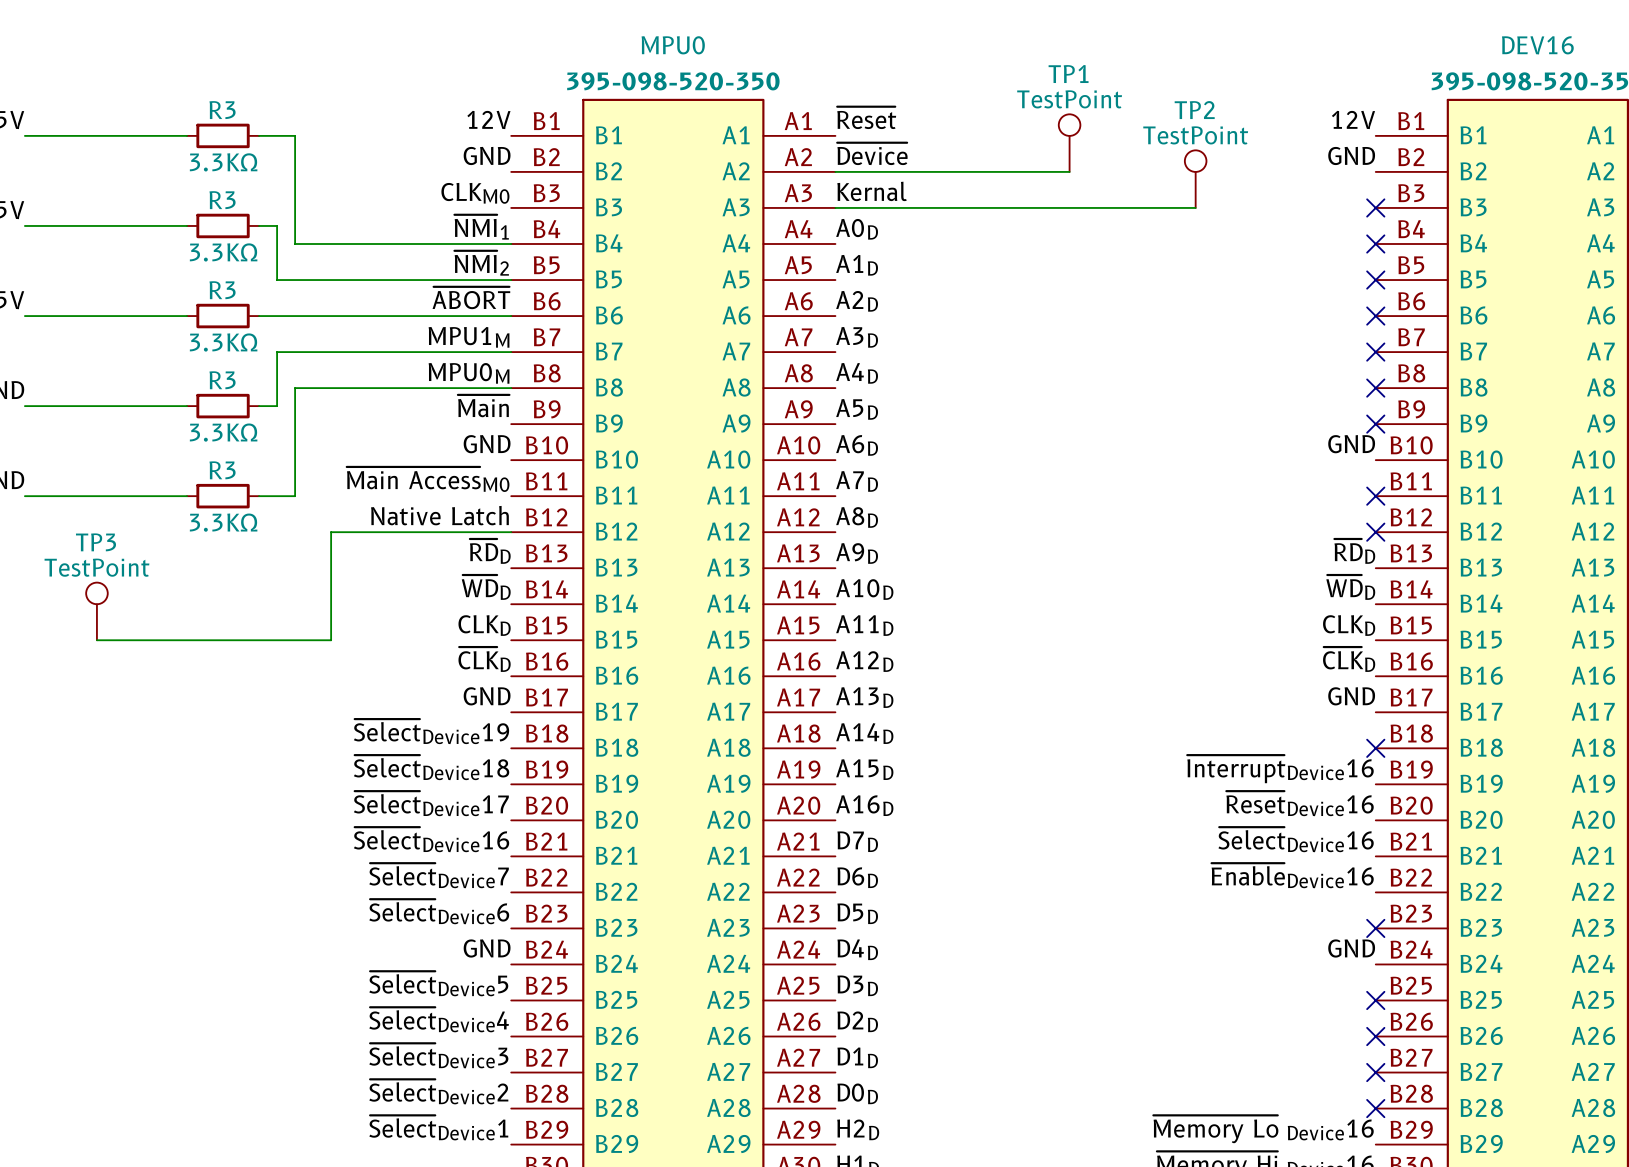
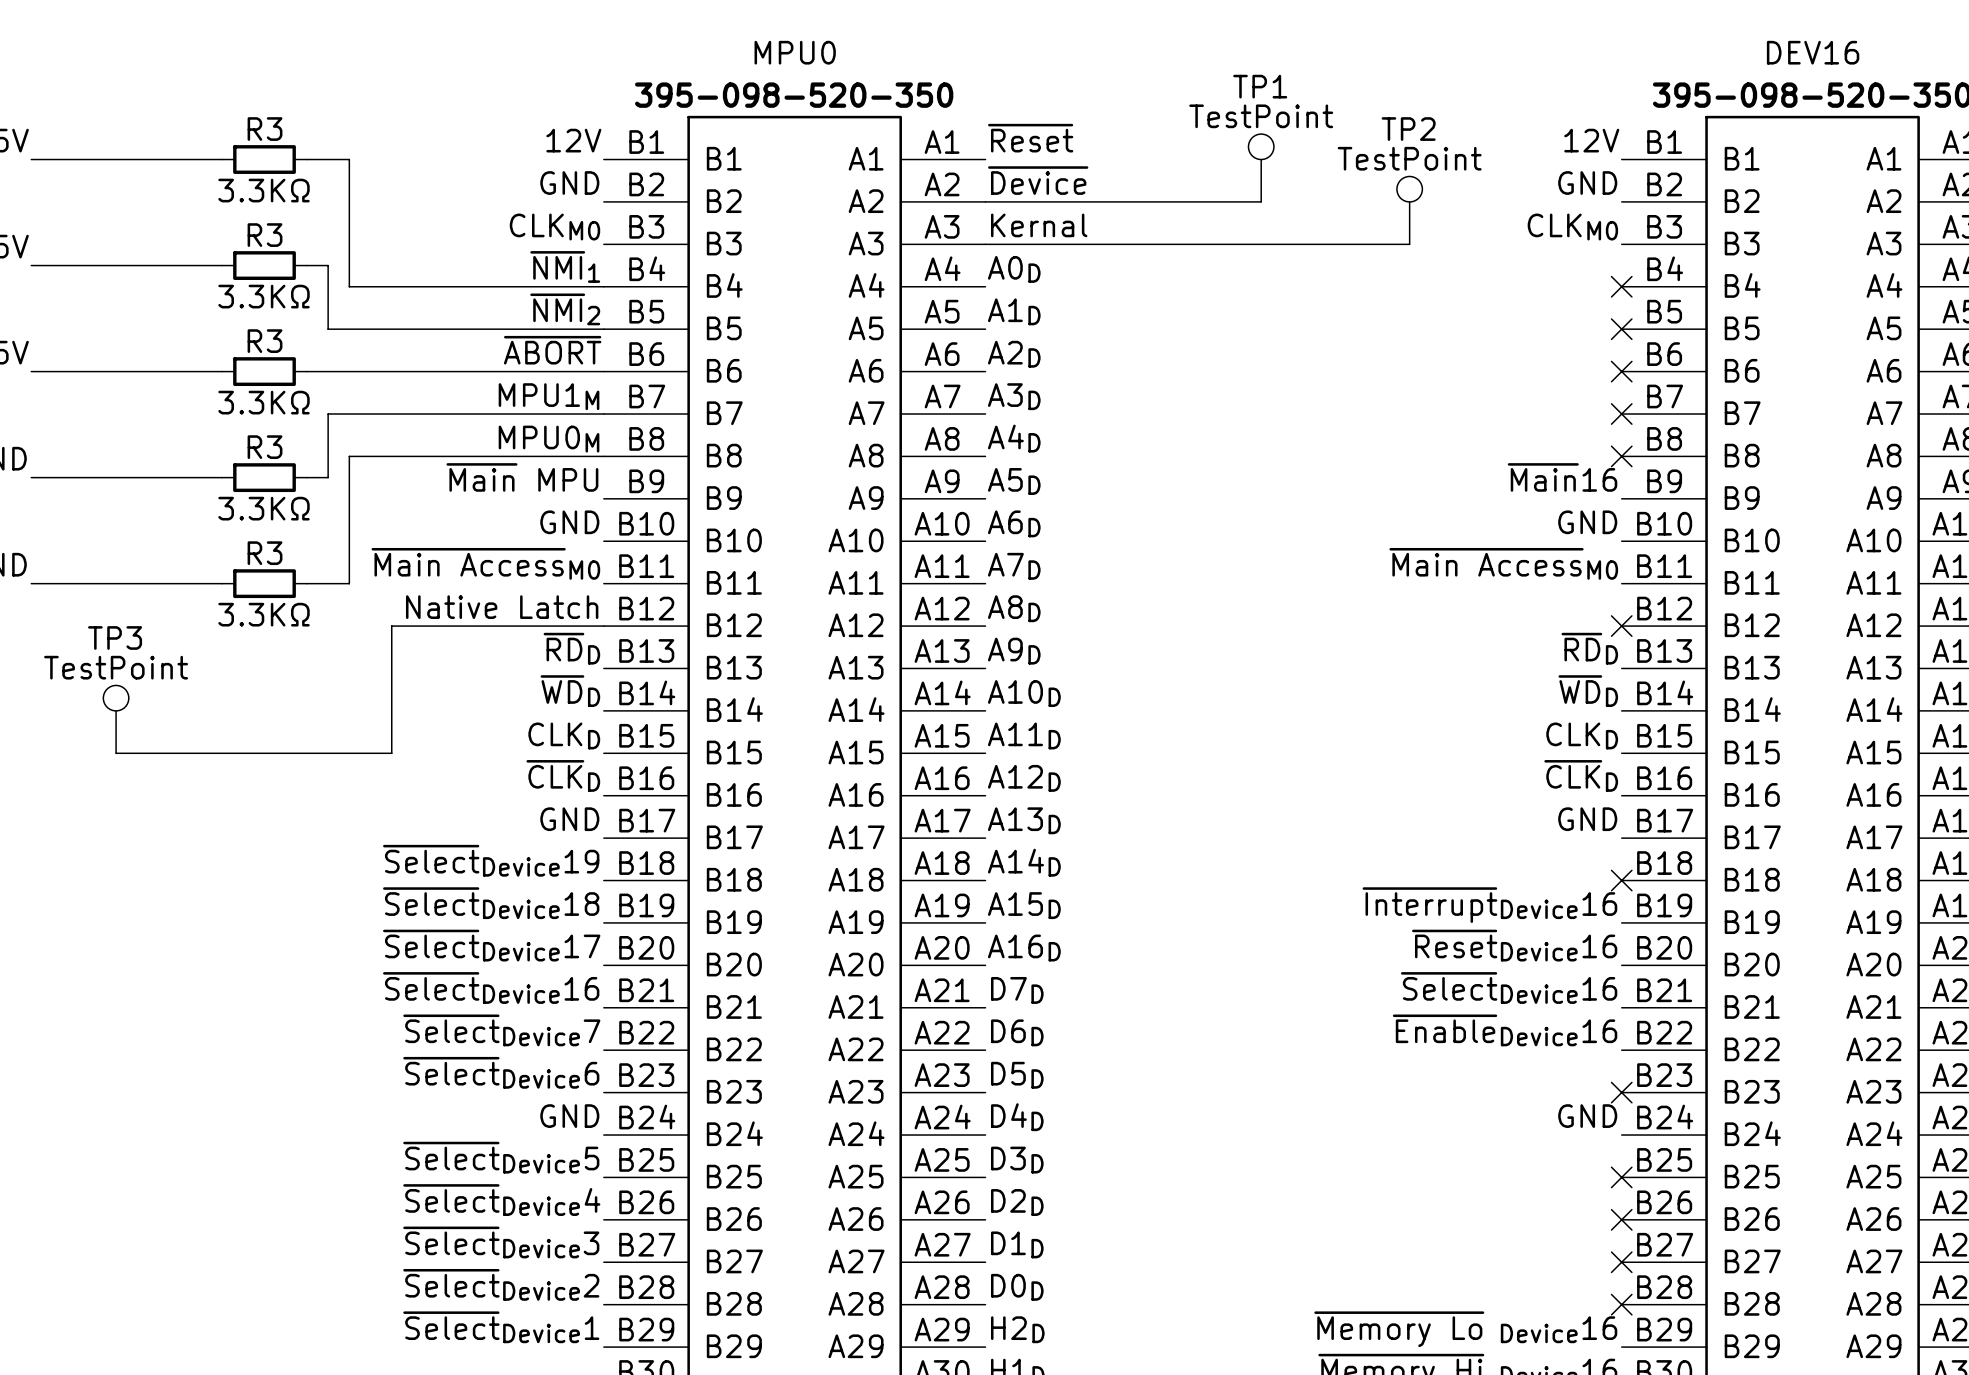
label: none -> CLKM0 (1572, 227)
no-connect mark: (1375, 207) -> none
label: ~{Main} (483, 406) -> ~{Main} MPU (522, 477)
label: none -> ~{Main}16 (1562, 477)
no-connect mark: (1375, 424) -> none
label: none -> ~{Main Access}M0 (1503, 563)
no-connect mark: (1375, 496) -> none

